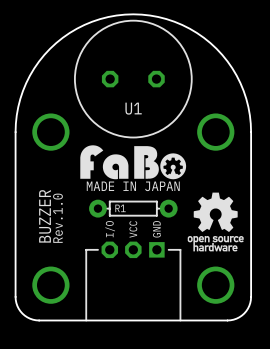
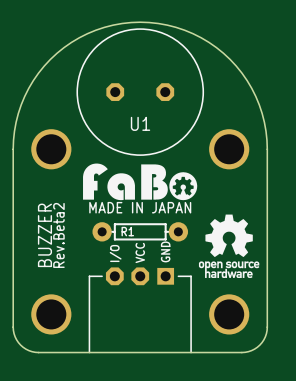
text: Rev.1.0 (57, 218) -> Rev.Beta2 (58, 235)

